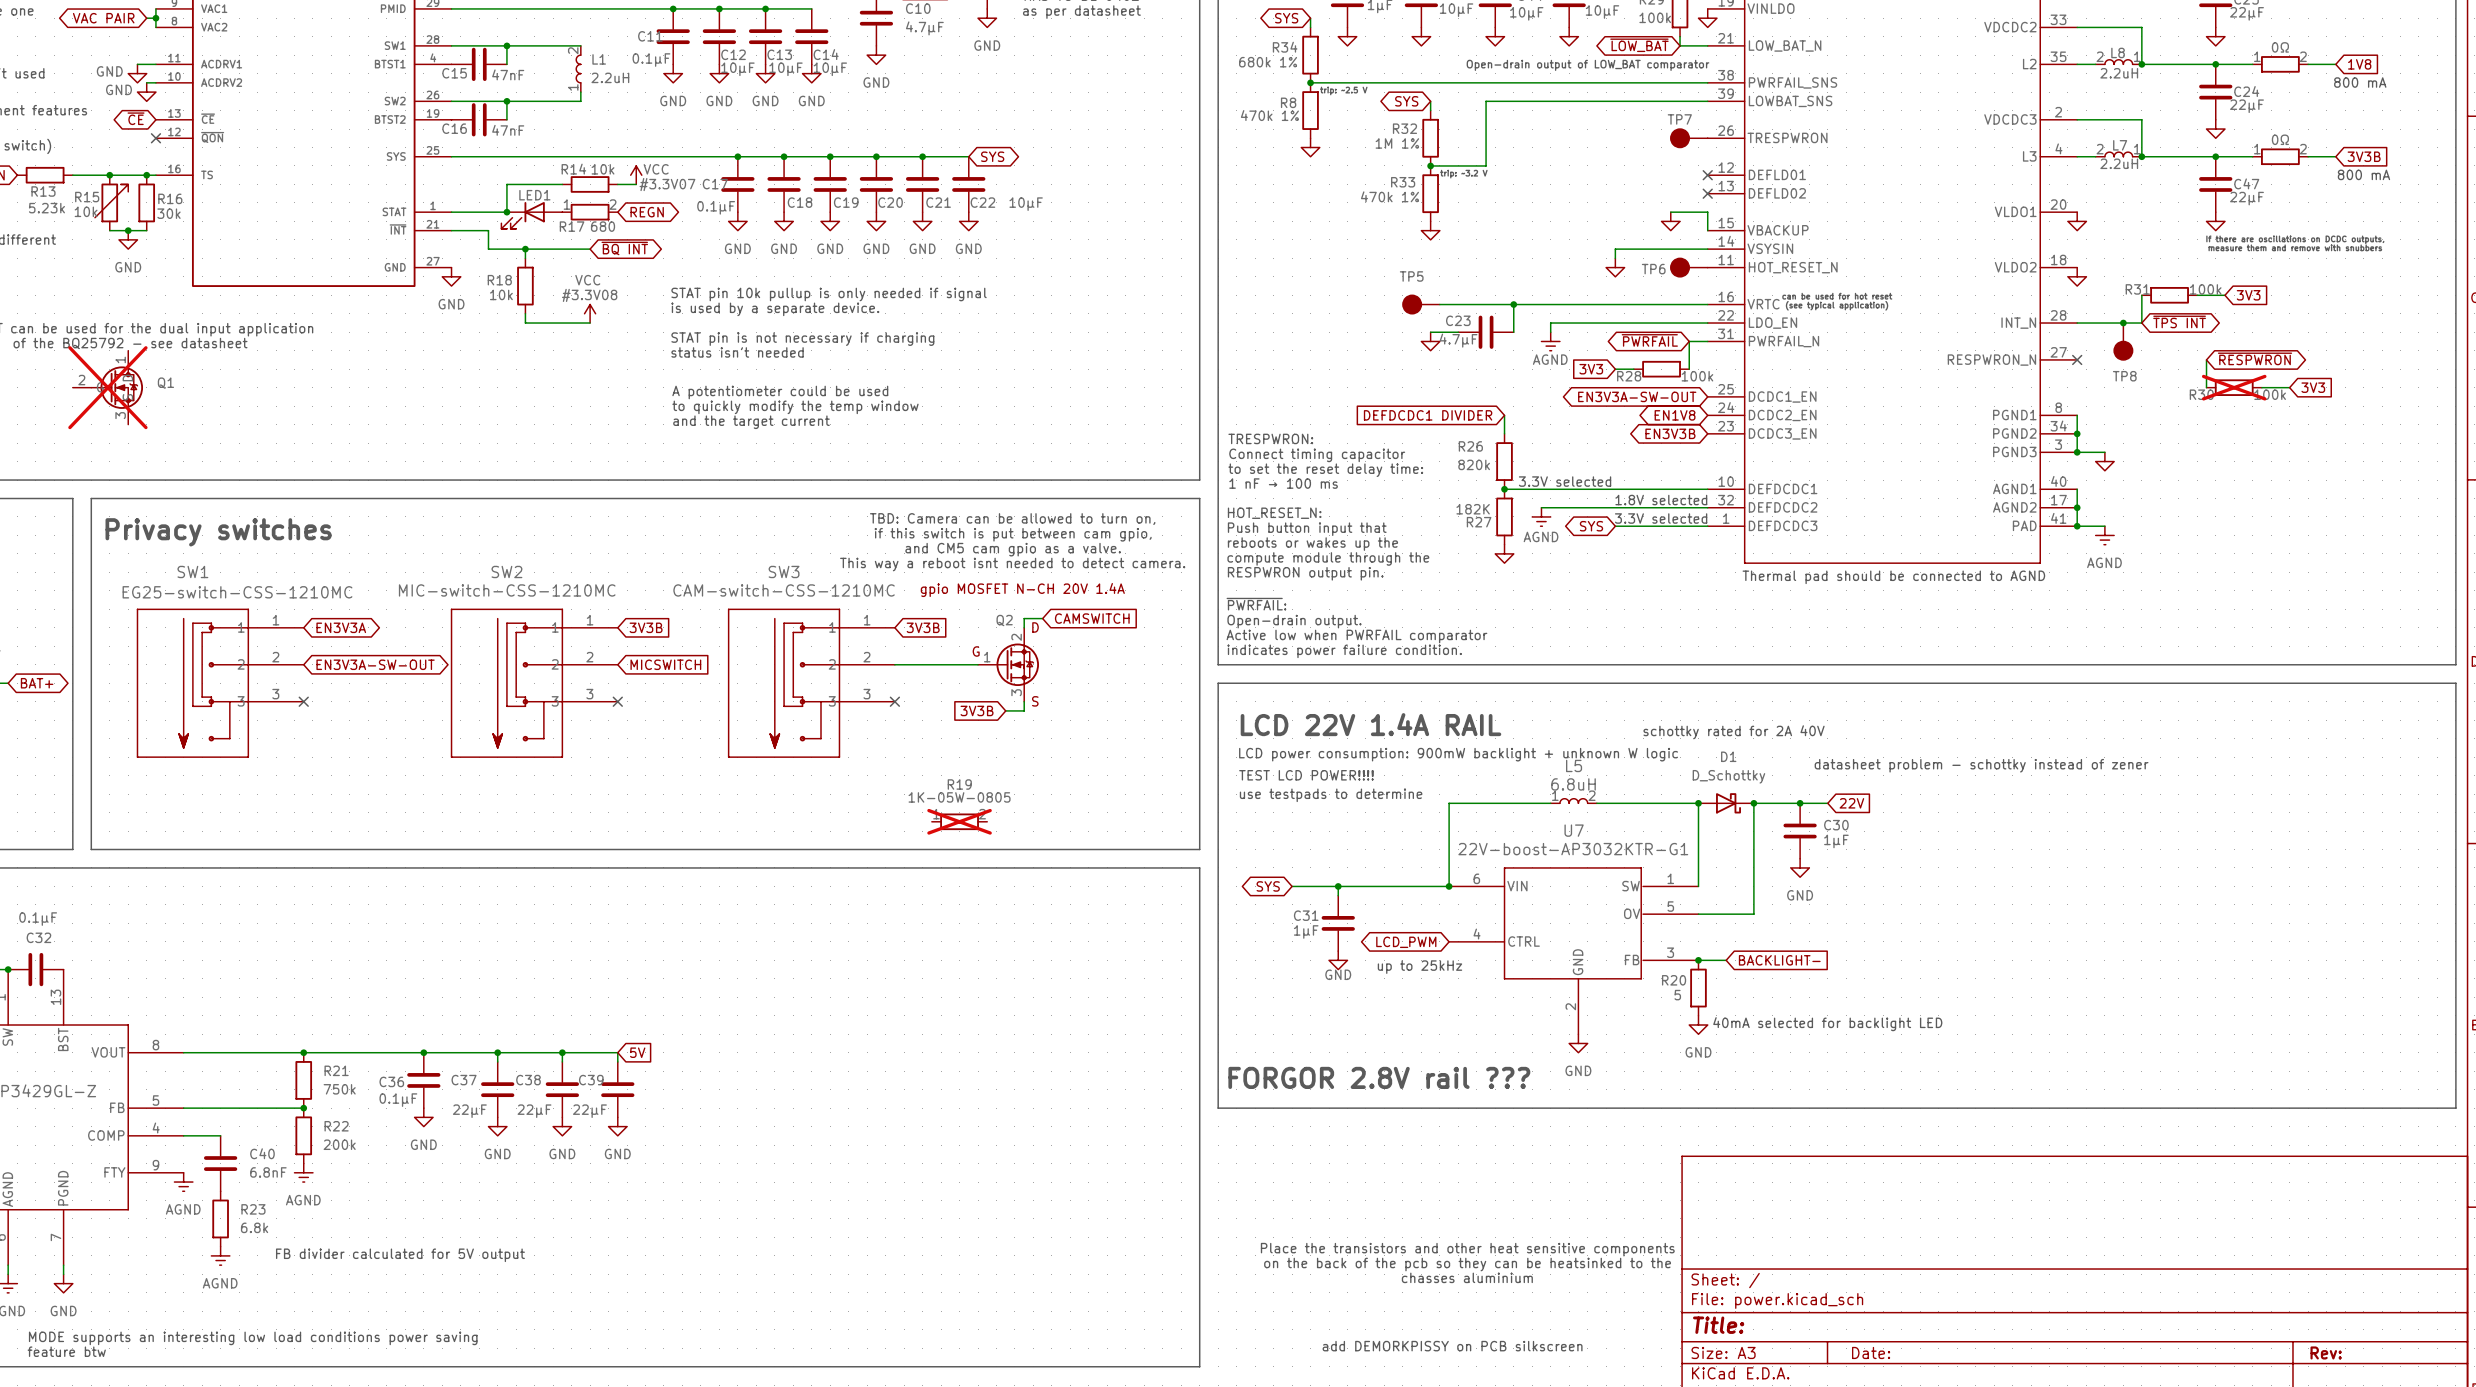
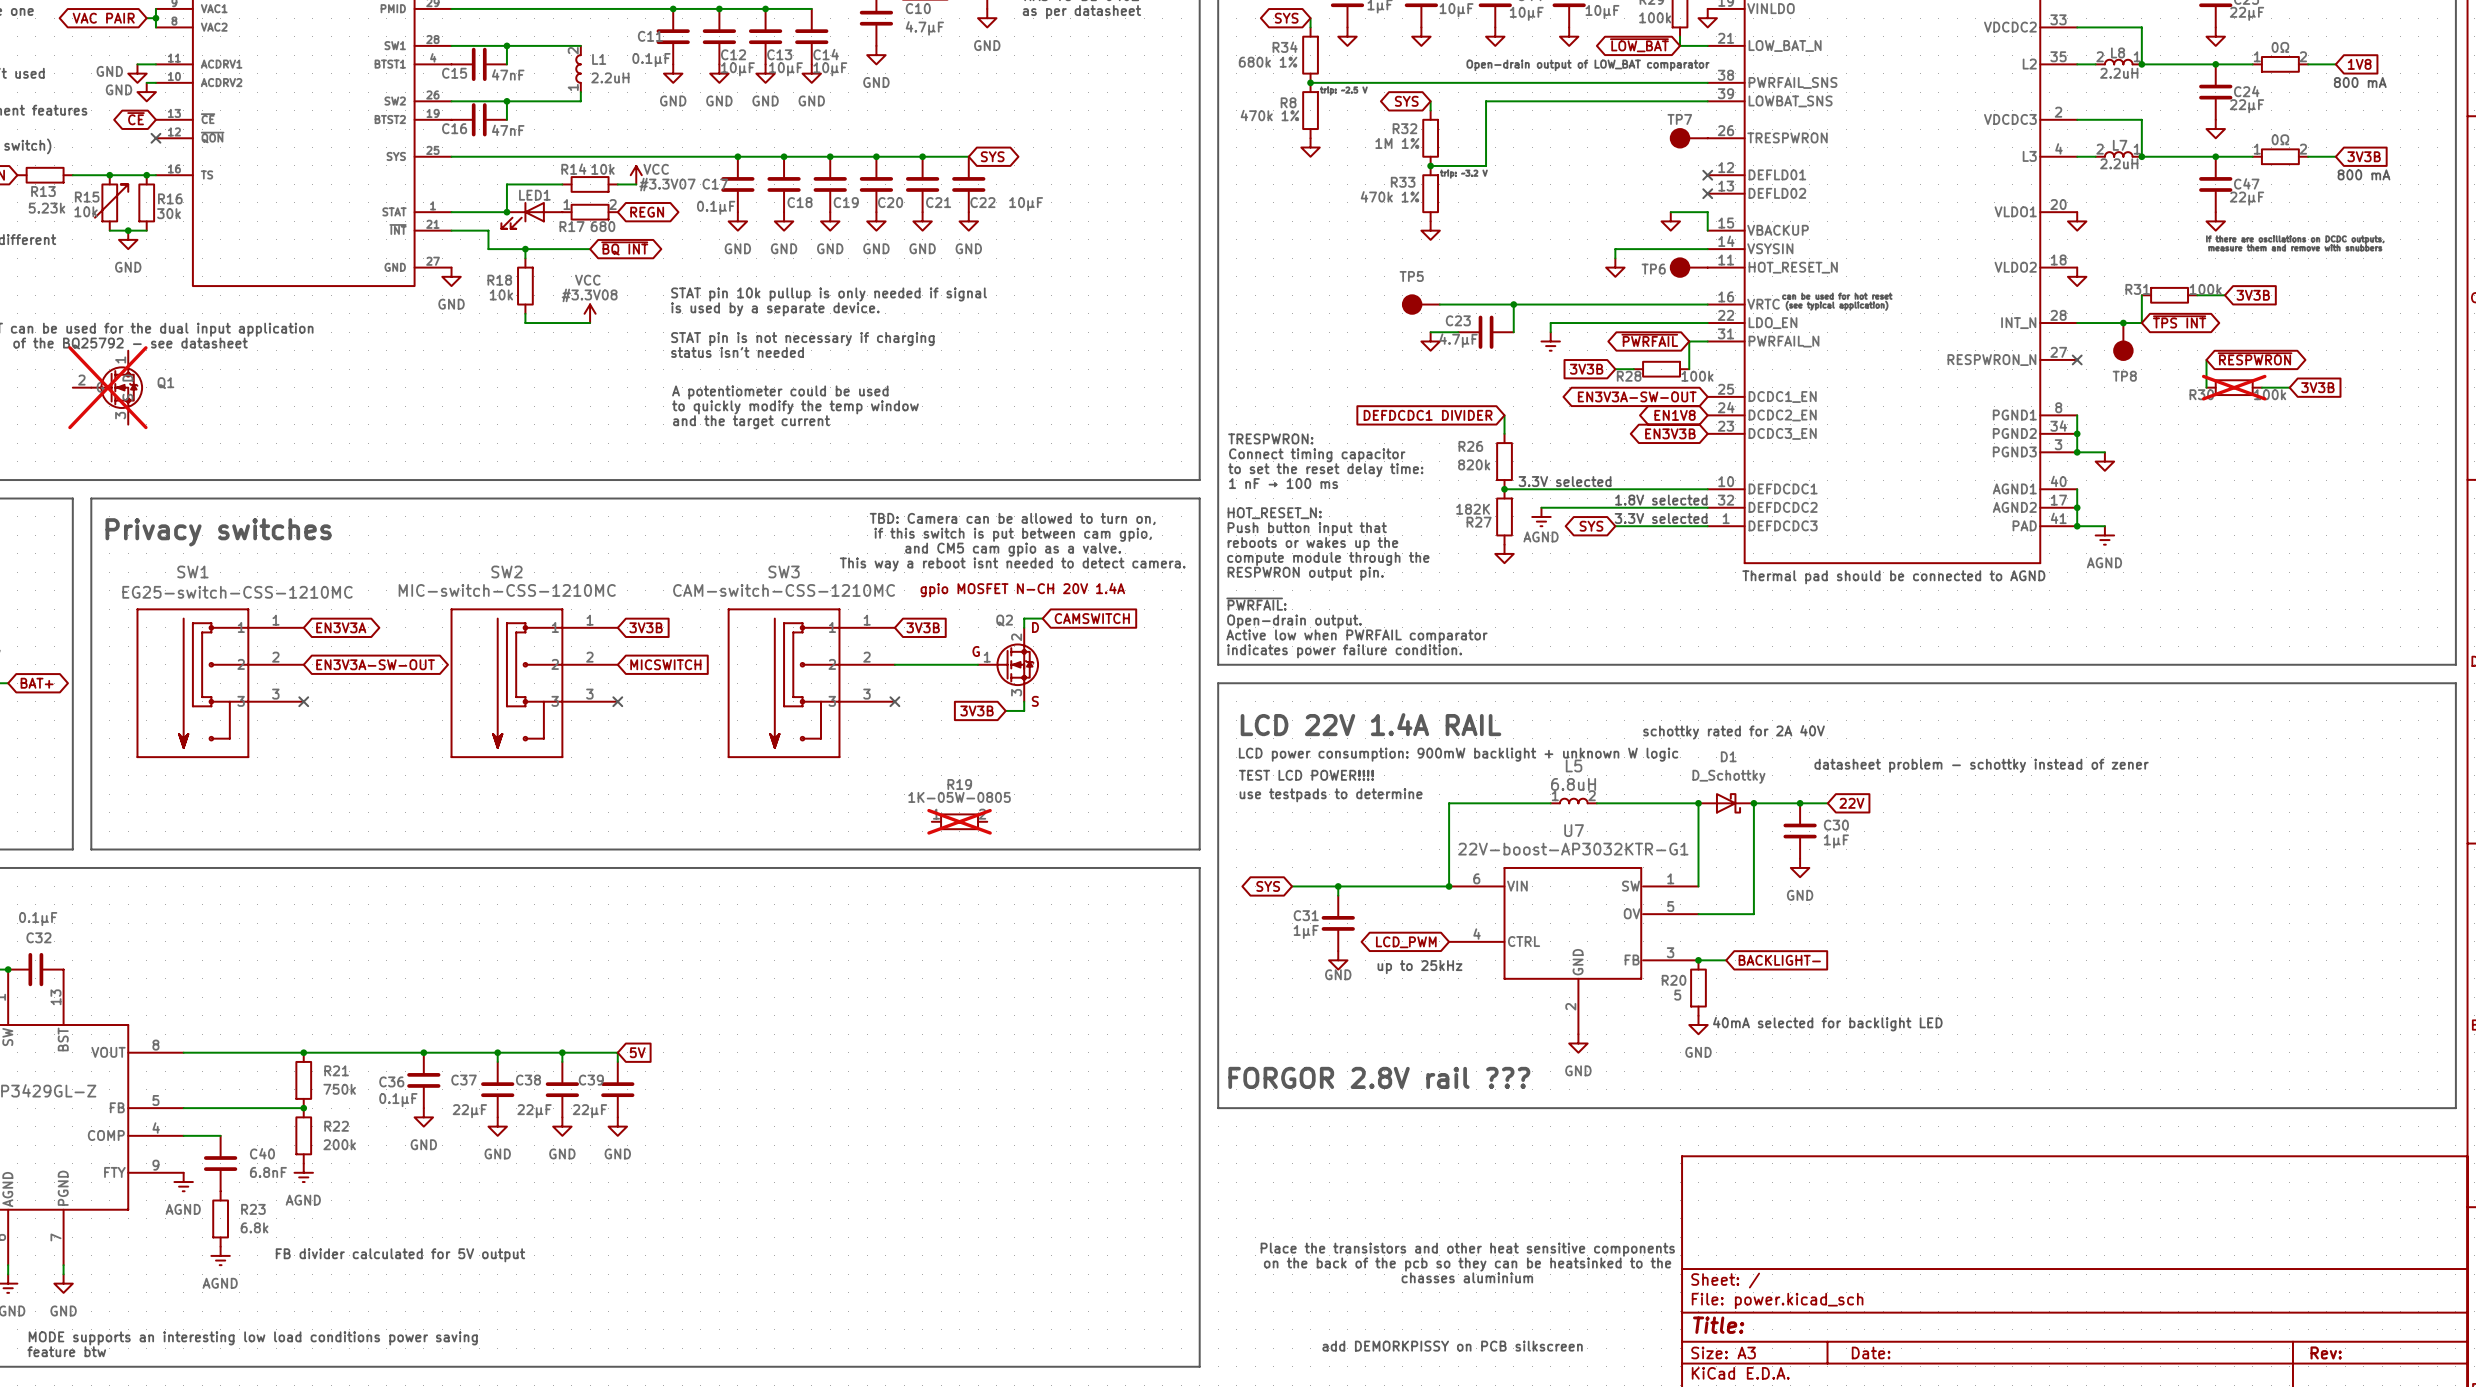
global label: 3V3 (2248, 295) -> 3V3B (2253, 295)
power symbol text: AGND (1550, 359) -> none
global label: 3V3 (1591, 369) -> 3V3B (1586, 369)
global label: 3V3 (2313, 387) -> 3V3B (2317, 387)

